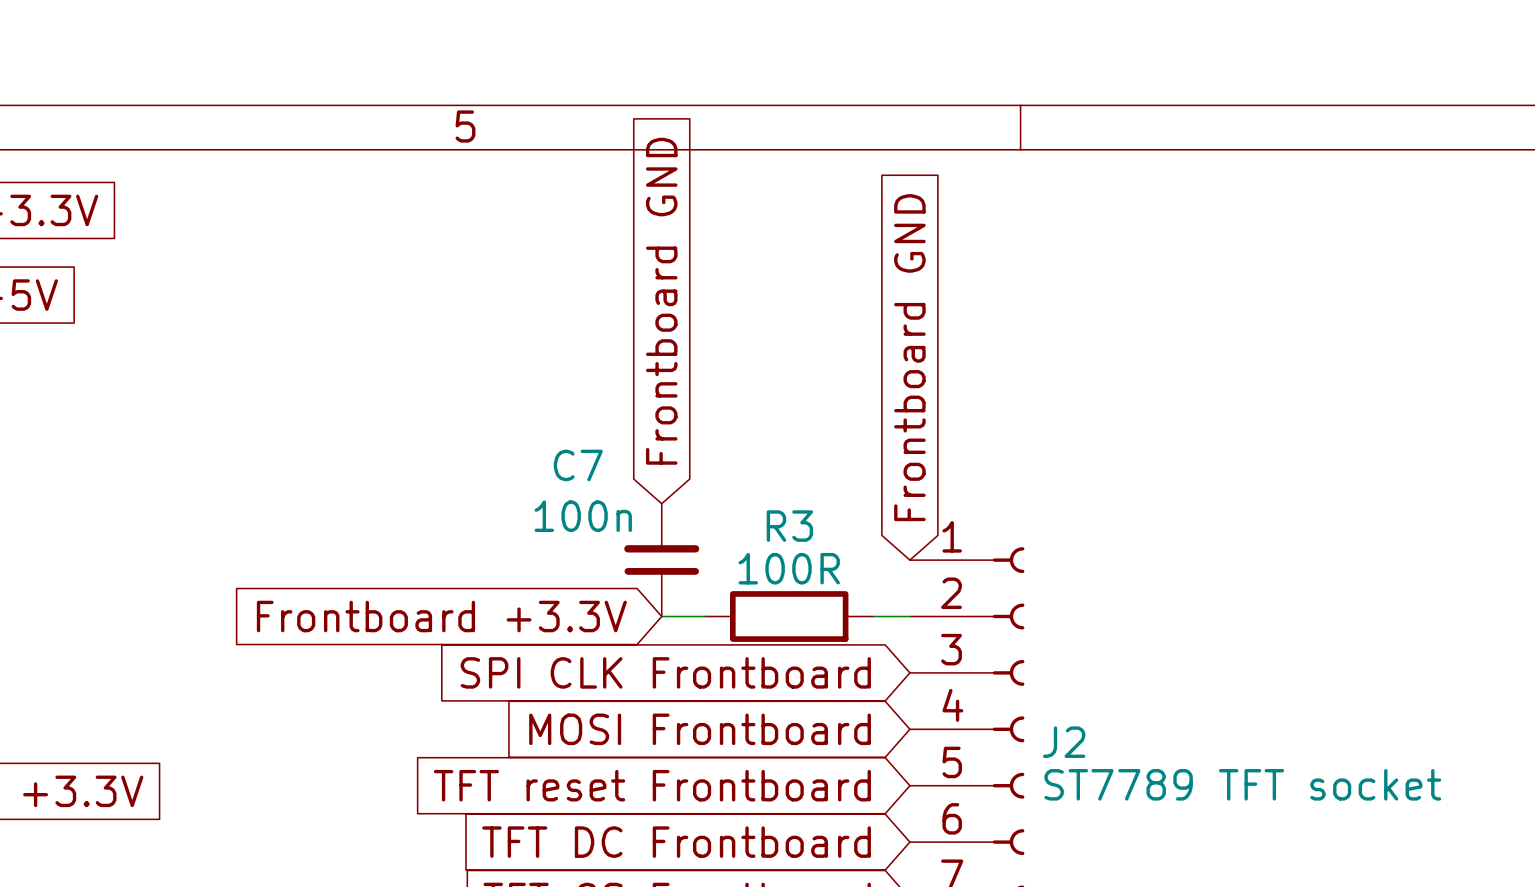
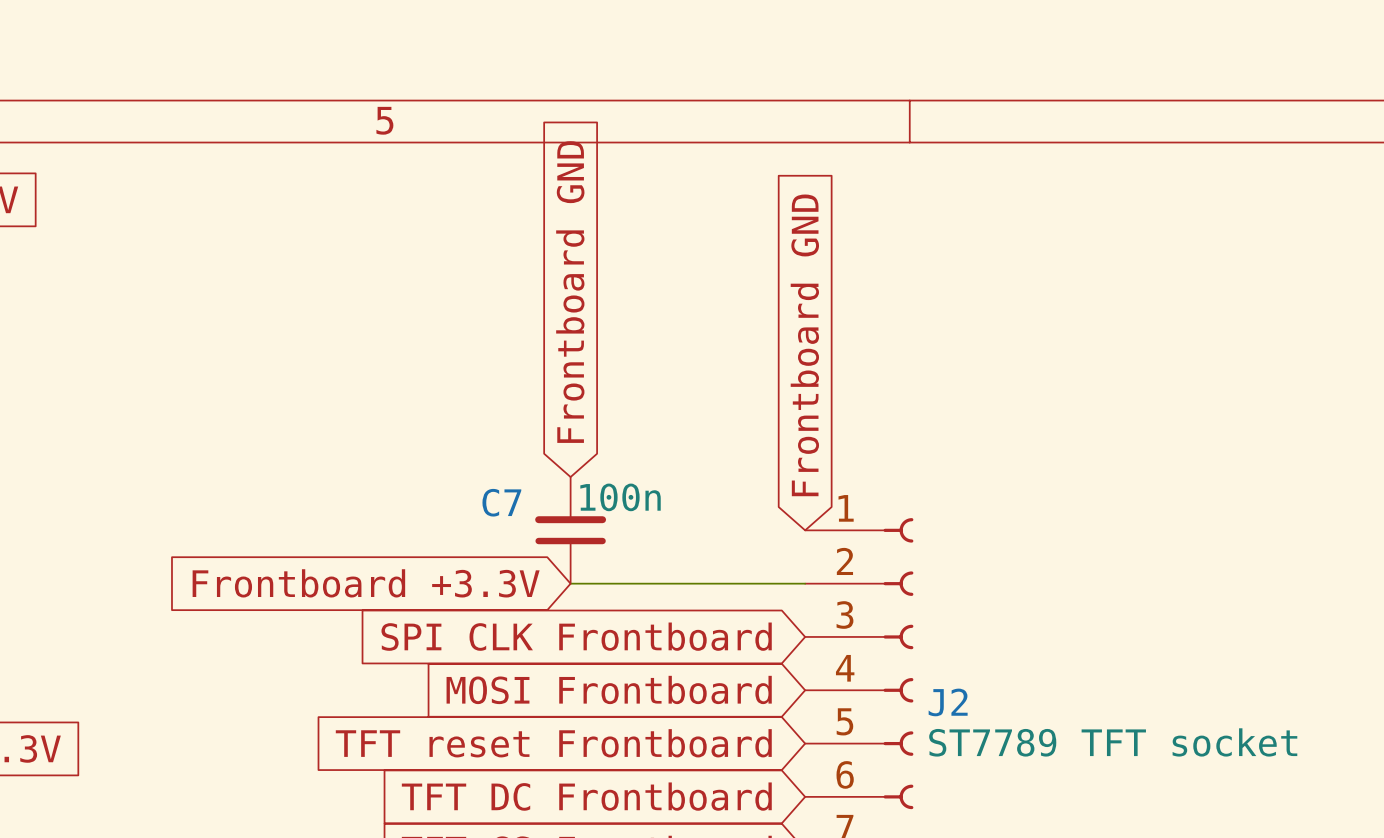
C7 name position: C7 (578, 465) -> C7 (501, 502)
C7 value position: 100n (583, 516) -> 100n (620, 497)
wire: none -> (611, 583) (771, 583)
R3: 100R (789, 616) -> none

